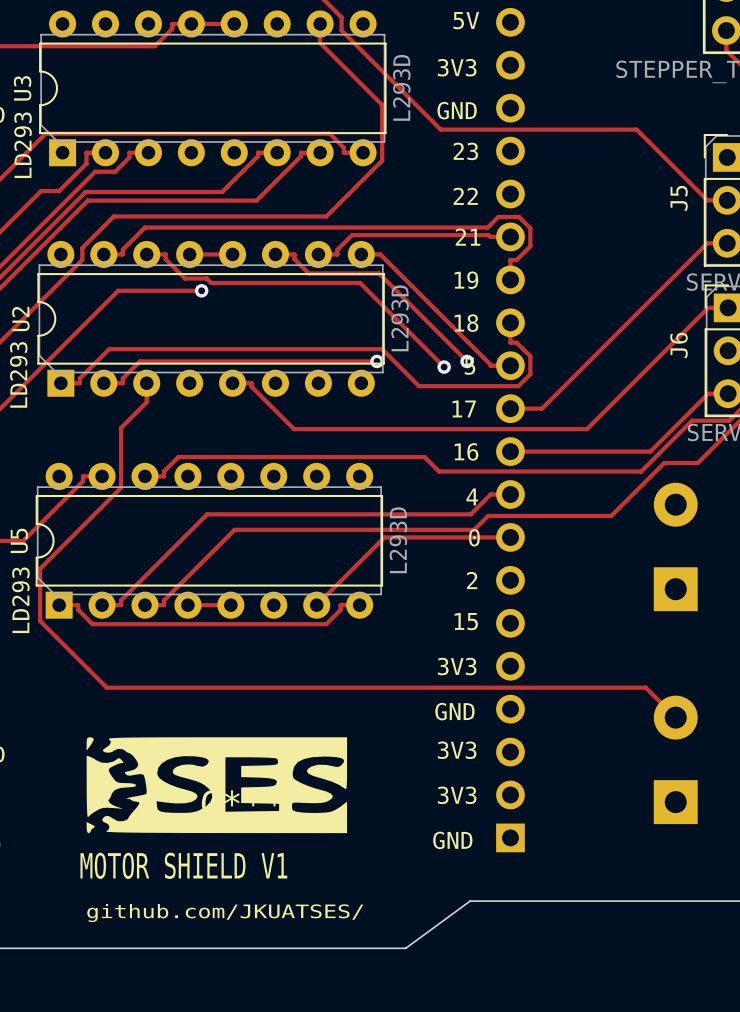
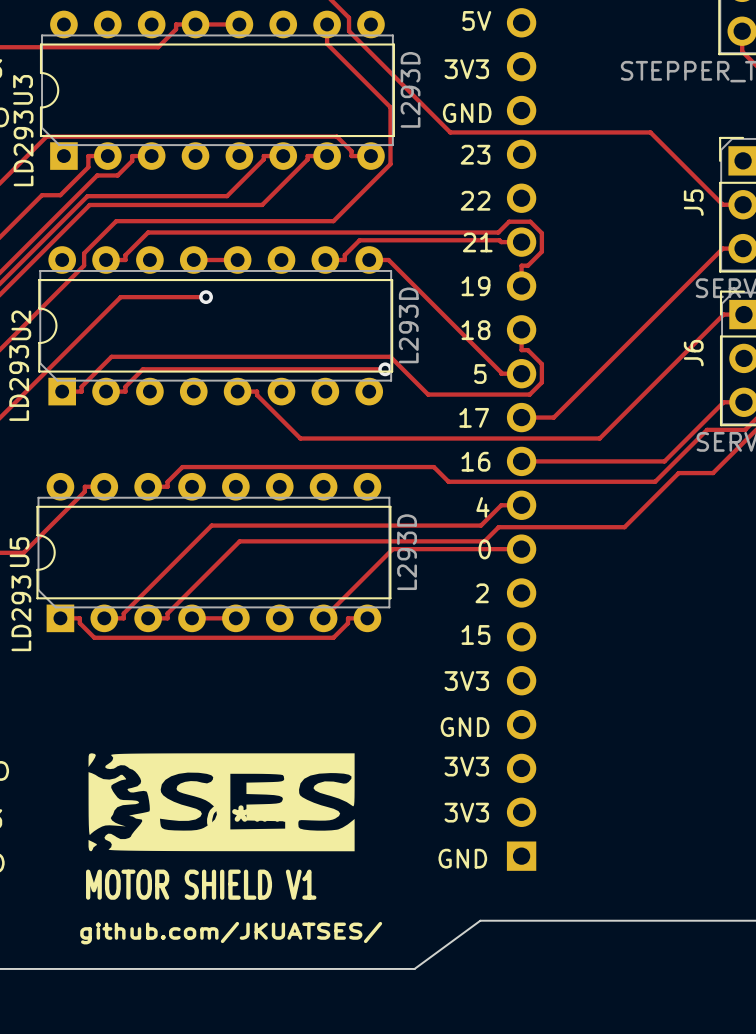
track: (146, 254) (165, 254) (165, 259) (185, 278) (206, 278) (211, 282) (360, 282) (444, 367) -> none
track: (275, 254) (294, 254) (294, 259) (308, 273) (379, 273) (467, 361) -> none
via: (467, 361) -> none
via: (444, 367) -> none
track: (146, 383) (146, 402) (121, 427) (121, 487) (40, 568) (40, 621) (106, 687) (645, 687) (675, 717) -> none
part: (675, 546) -> none
part: (675, 759) -> none

